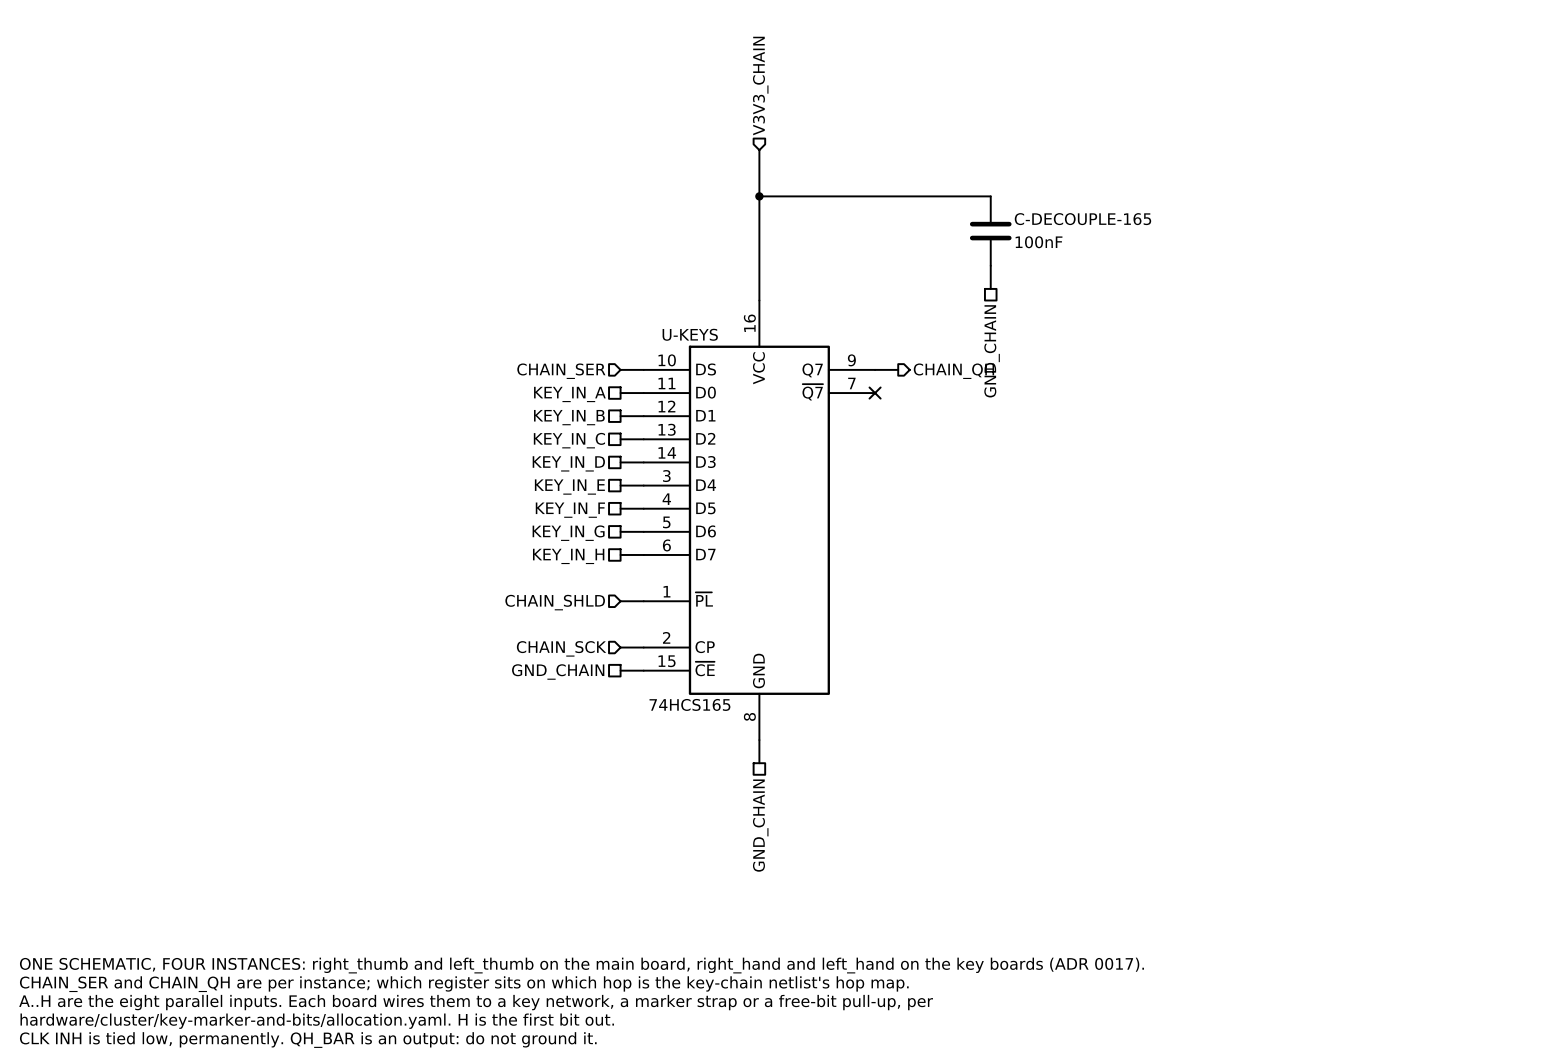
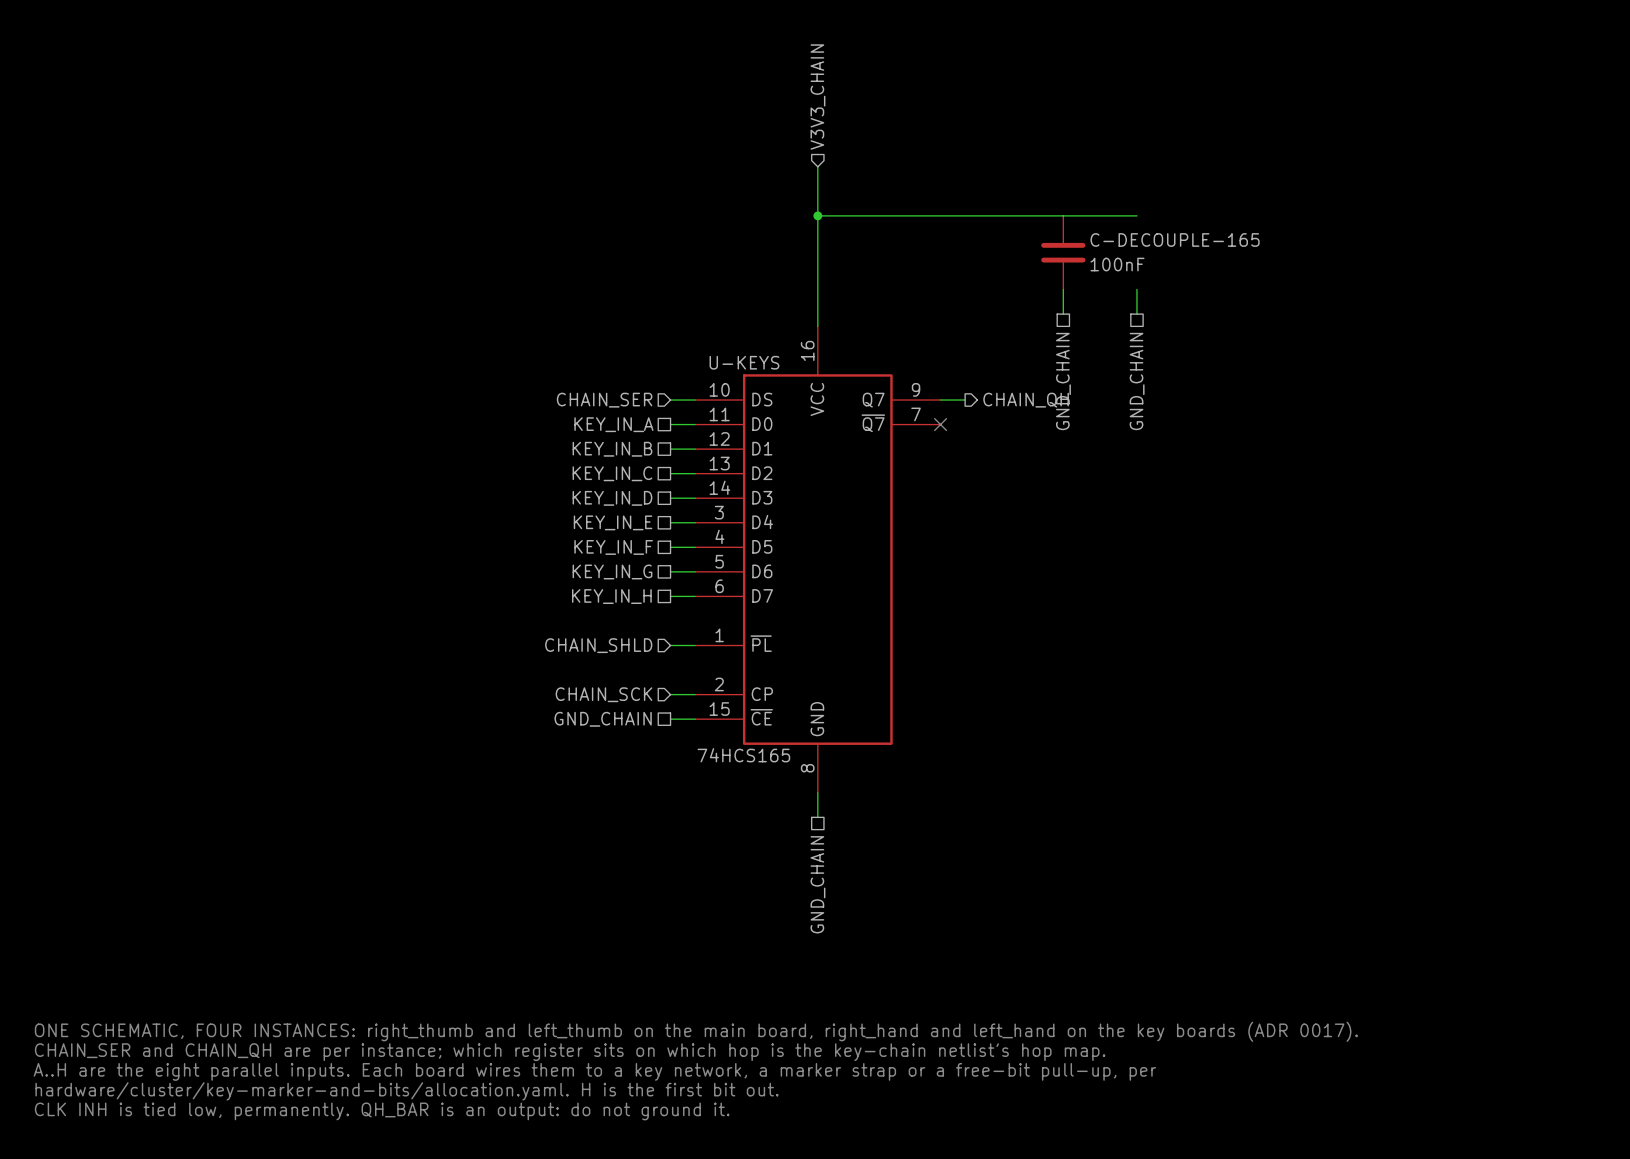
wire: none -> (1063, 215) (1136, 215)
wire: none -> (1136, 289) (1136, 314)
hierarchical label: none -> GND_CHAIN (1137, 381)

